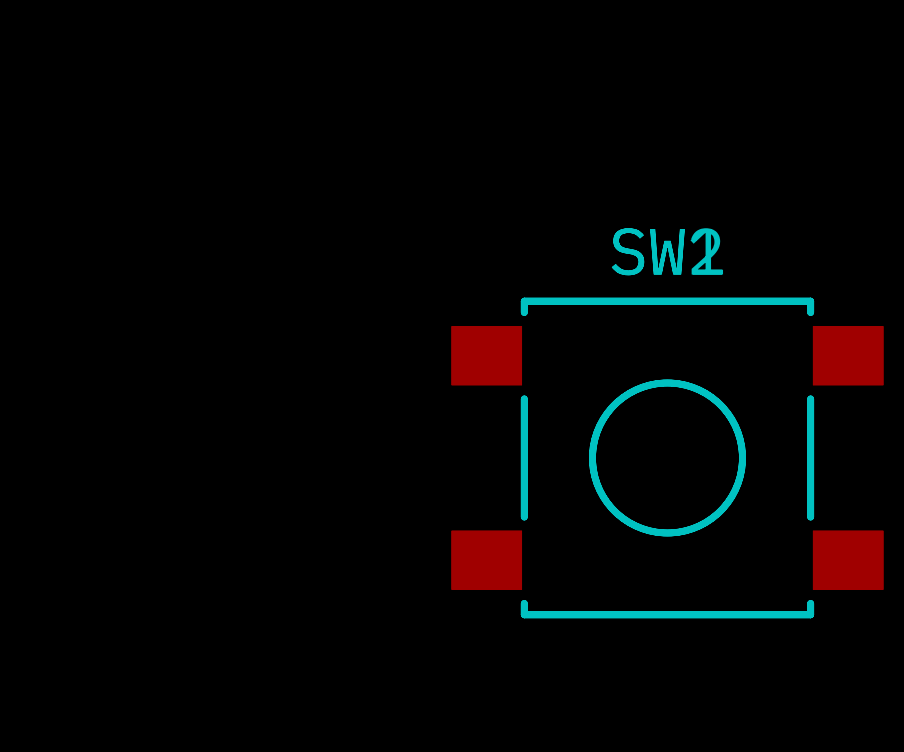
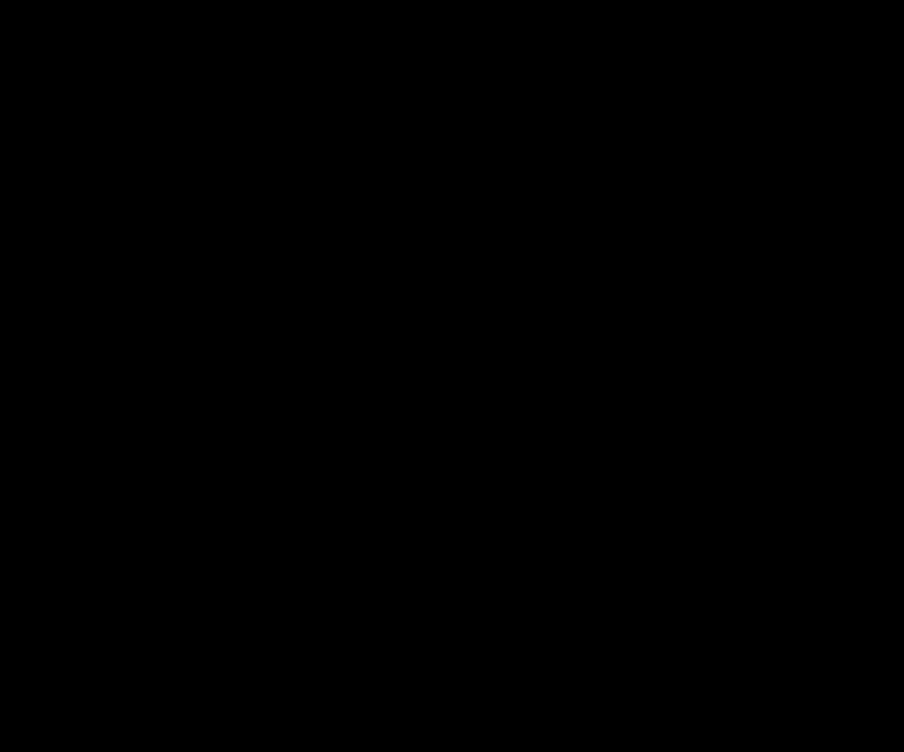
part: (667, 457) -> none
part: (667, 457) -> none

